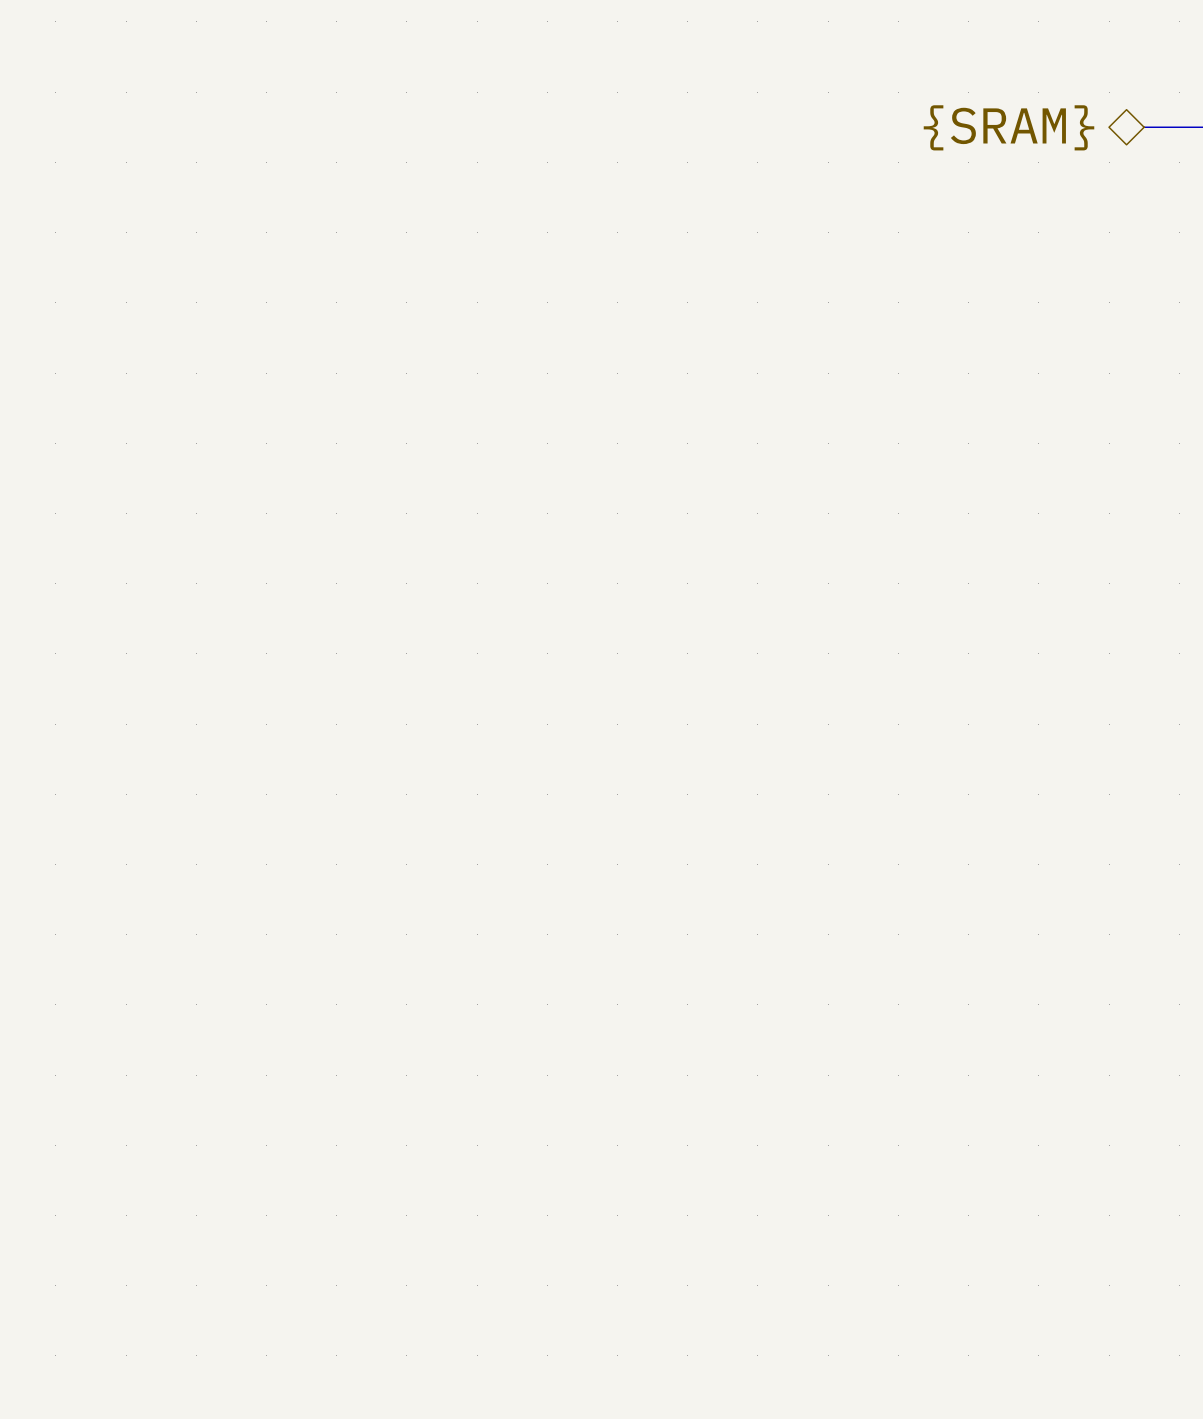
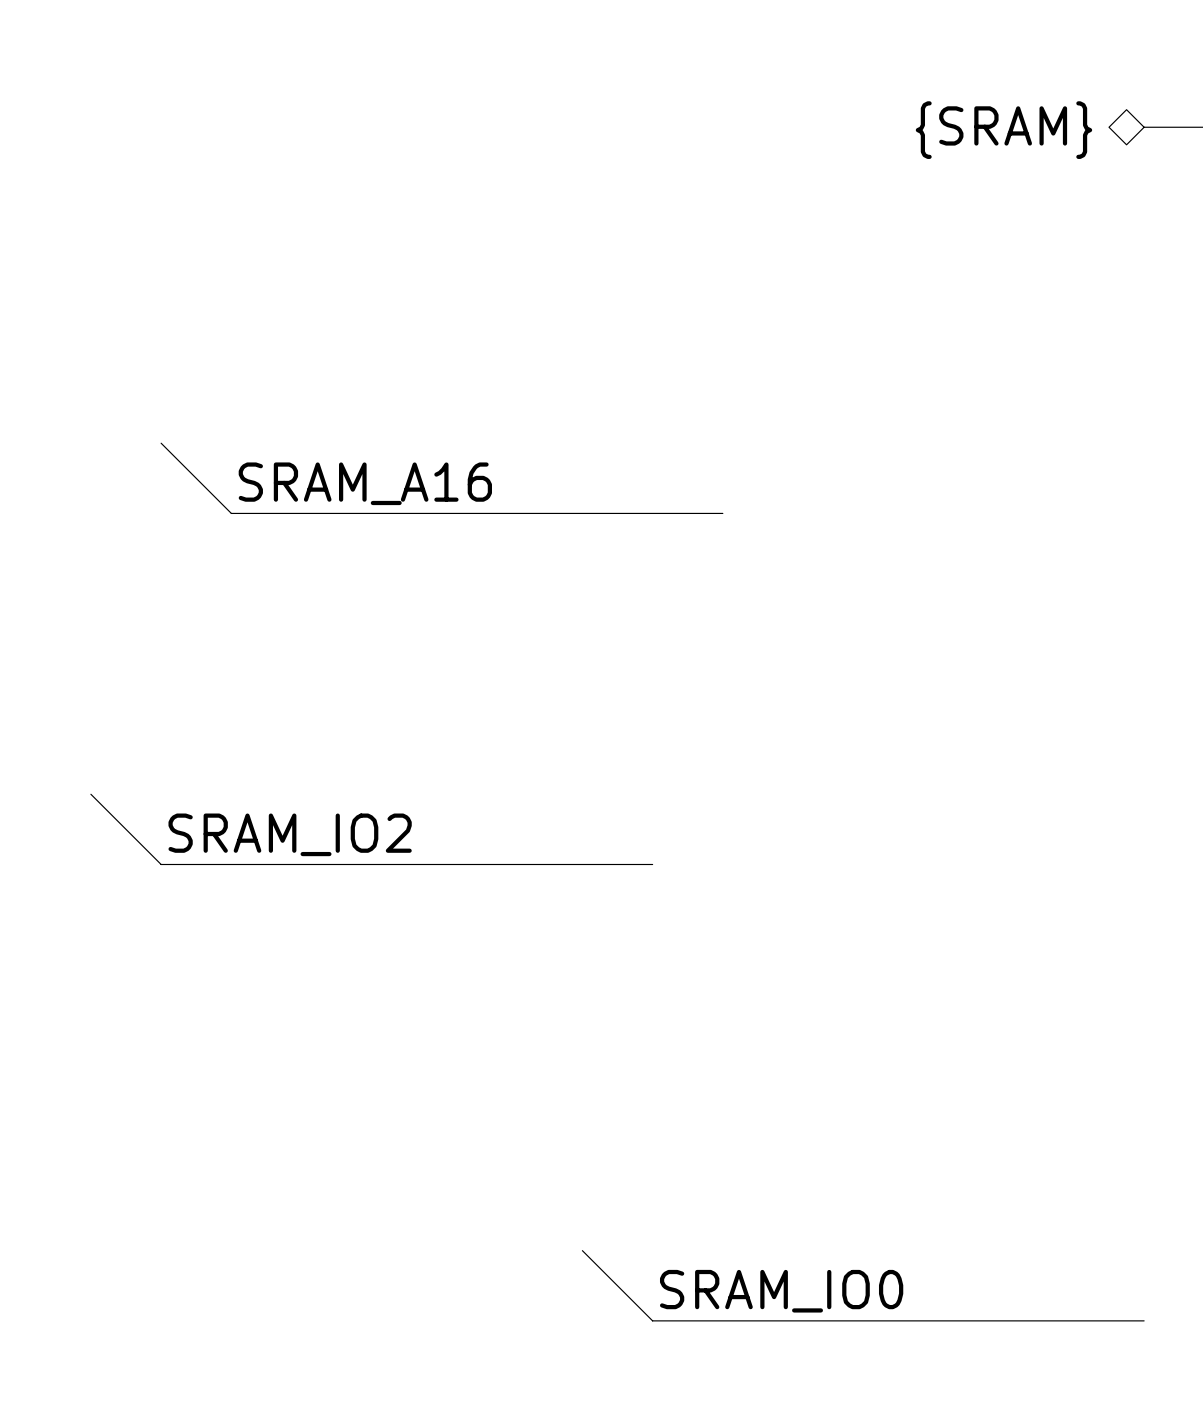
wire: none -> (161, 443) (231, 513) (722, 513)
label: none -> SRAM_A16 (365, 483)
wire: none -> (90, 794) (161, 864) (652, 864)
label: none -> SRAM_IO2 (290, 834)
wire: none -> (582, 1250) (652, 1320) (1144, 1320)
label: none -> SRAM_IO0 (781, 1291)

